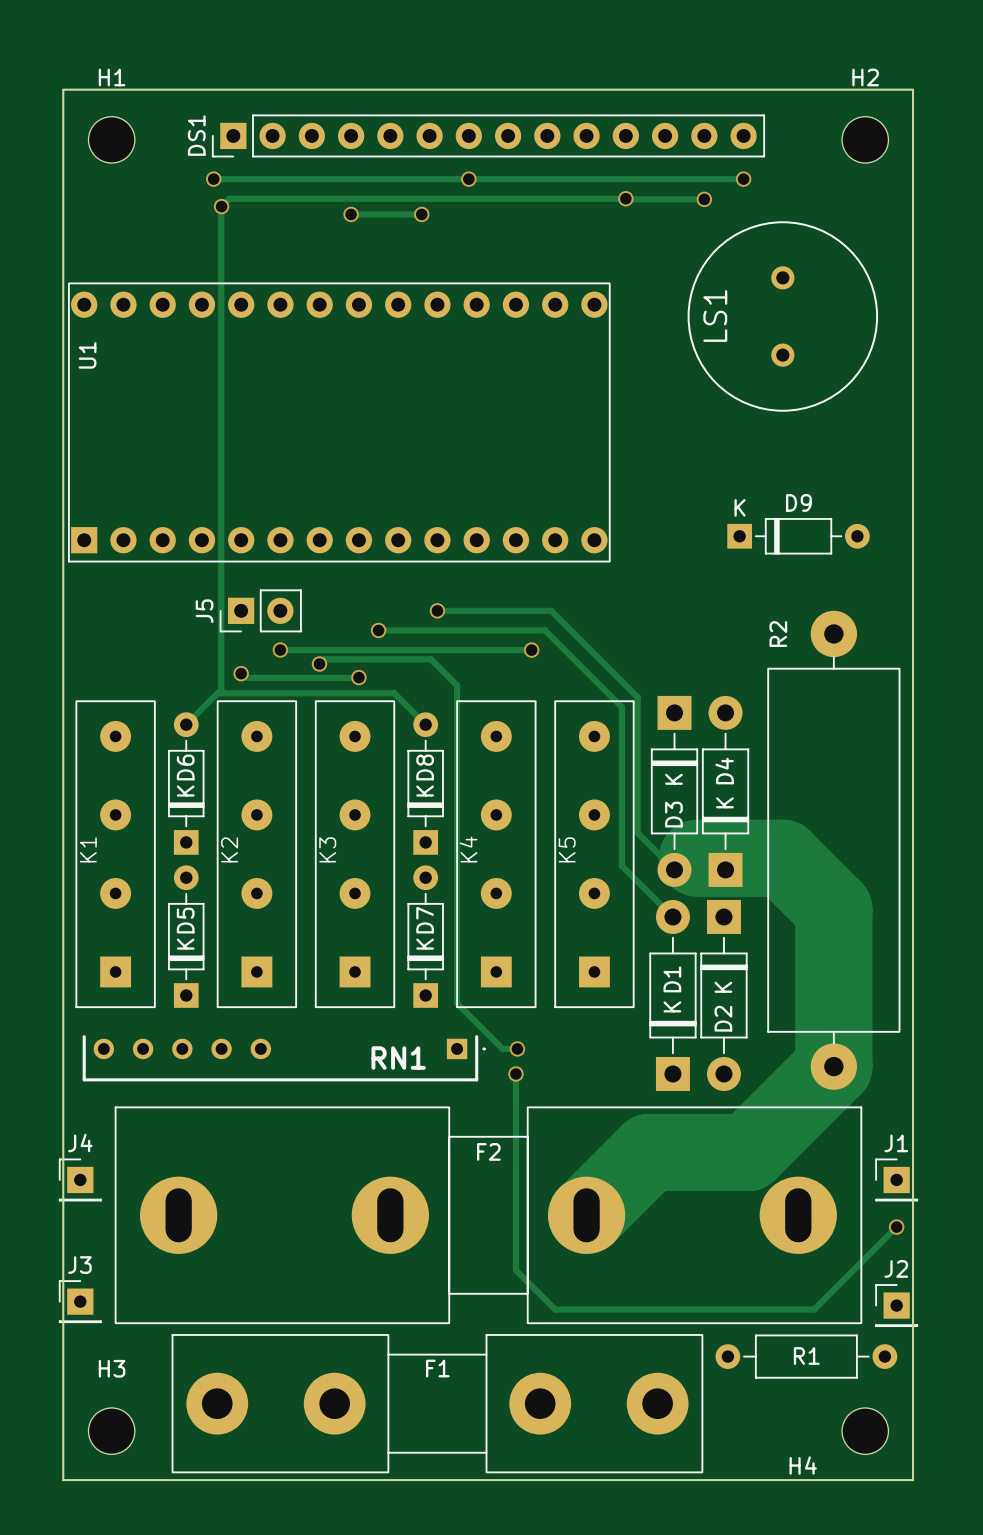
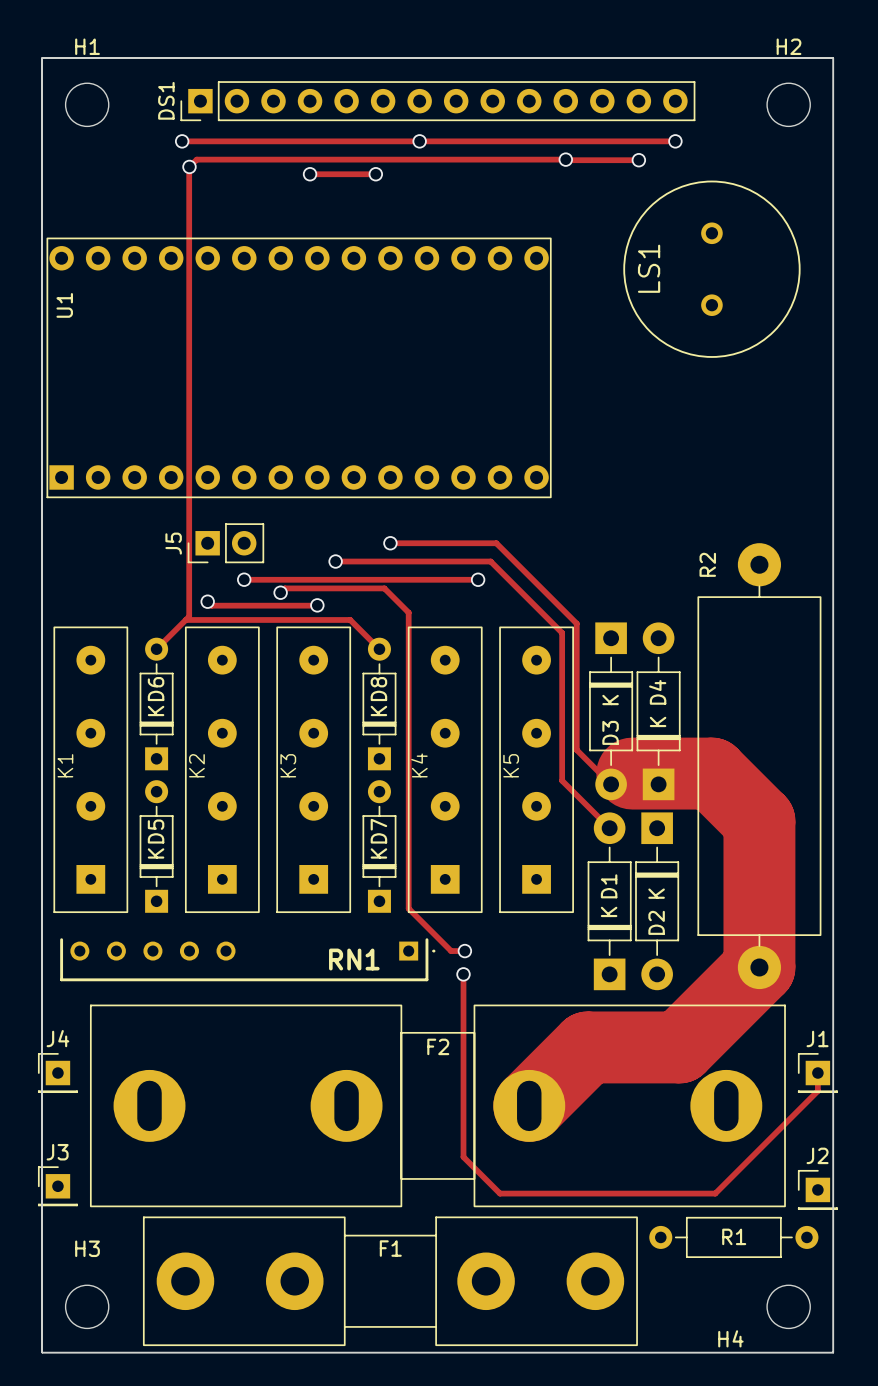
D9: (798, 536) -> none
track: (896, 1227) (814, 1309) (786, 1309) -> (817, 1073) (817, 1091) (715, 1193)
via: (896, 1227) -> none

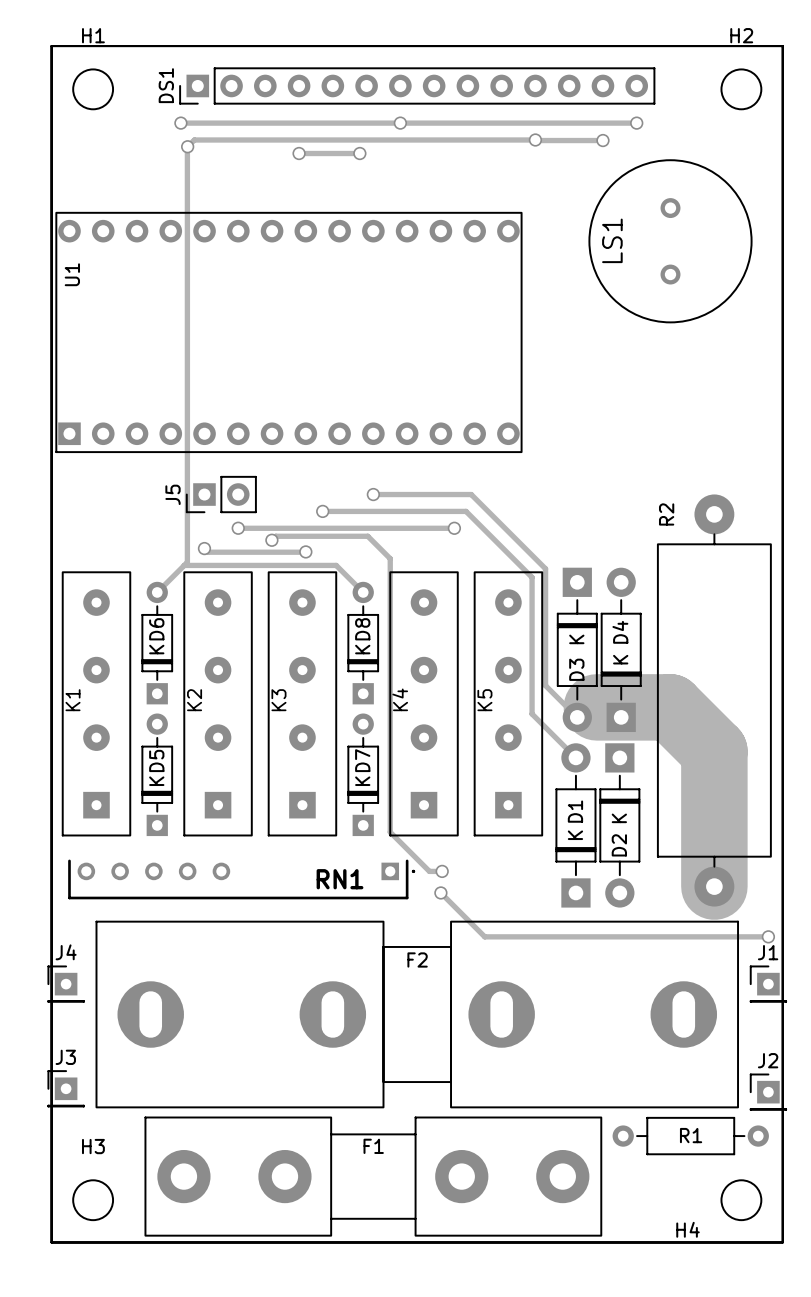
track: (759, 967) (679, 1047) (587, 1047) (529, 1105) -> none
track: (463, 974) (463, 1157) (500, 1193) (715, 1193) (817, 1091) (817, 1073) -> none
track: none -> (444, 896) (484, 936) (768, 936)
via: none -> (768, 936)

